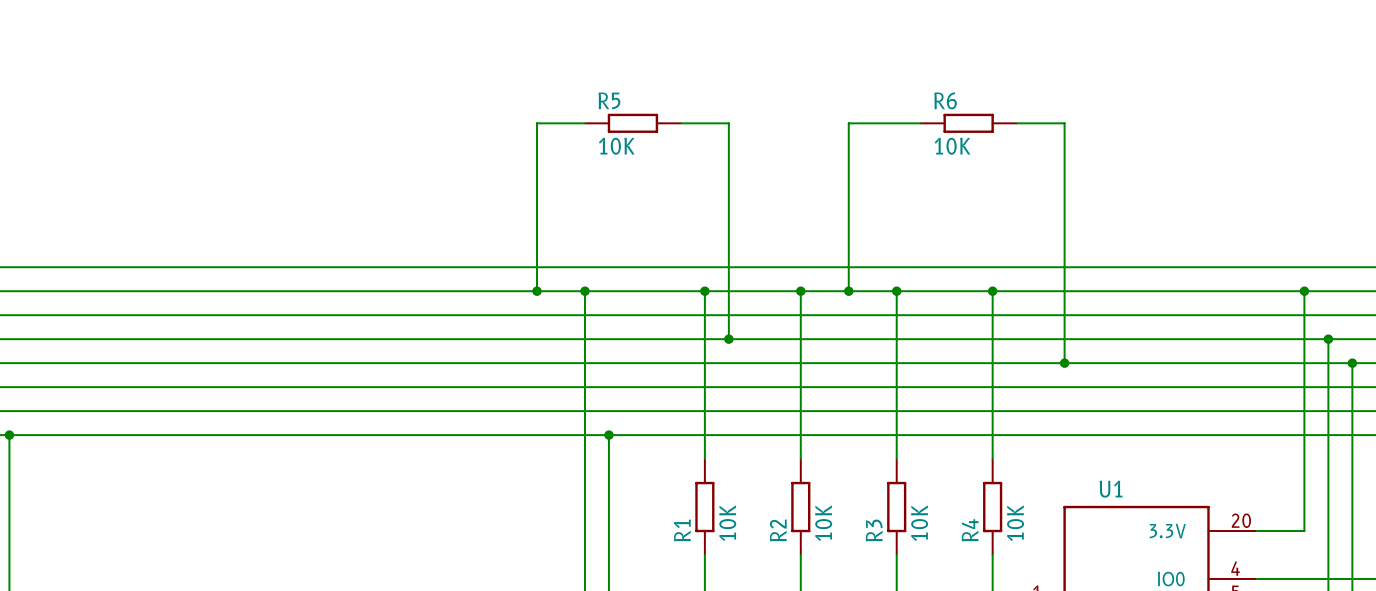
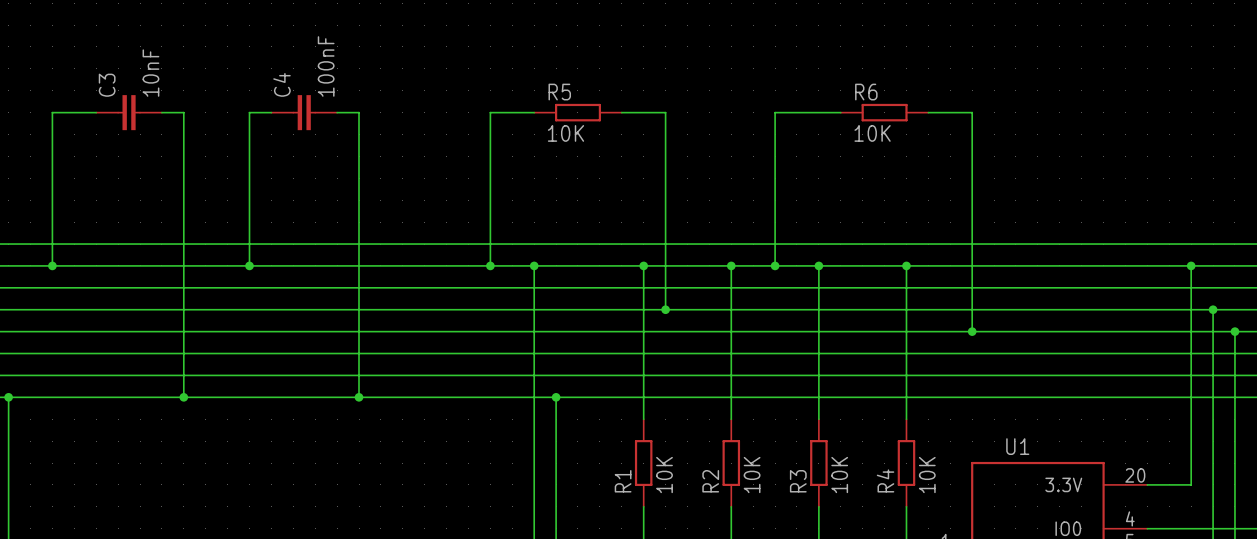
wire: none -> (96, 112) (52, 112) (52, 265)
C3: none -> 10nF (129, 112)
wire: none -> (161, 112) (183, 112) (183, 397)
wire: none -> (271, 112) (249, 112) (249, 265)
C4: none -> 100nF (304, 112)
wire: none -> (337, 112) (359, 112) (359, 397)
junction: none -> (52, 265)
junction: none -> (249, 265)
junction: none -> (183, 397)
junction: none -> (359, 397)

